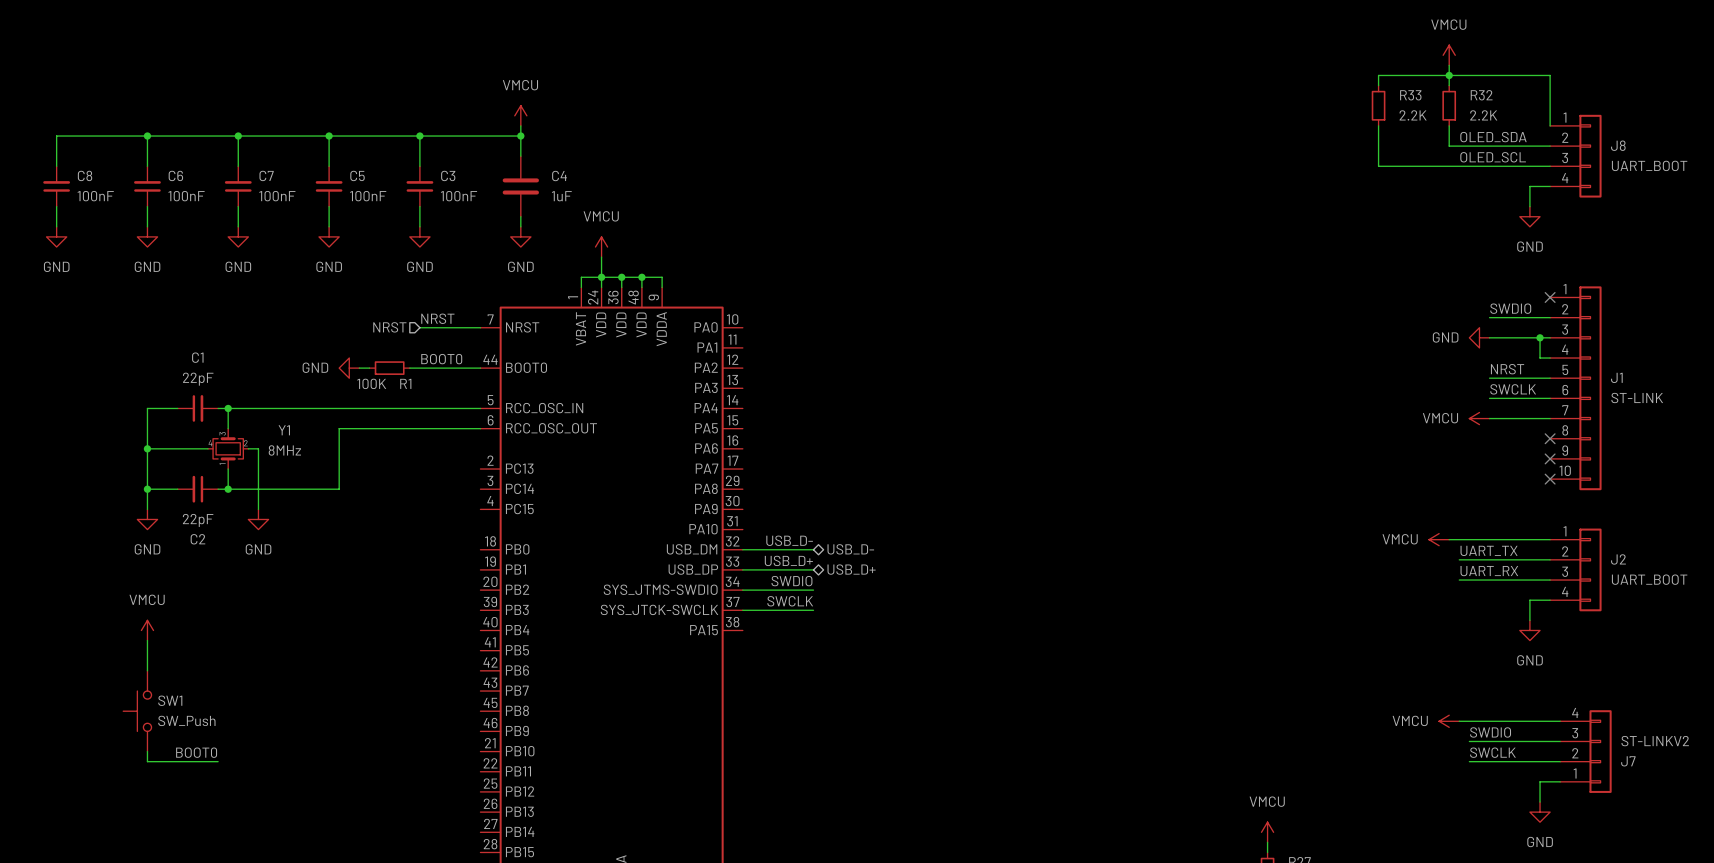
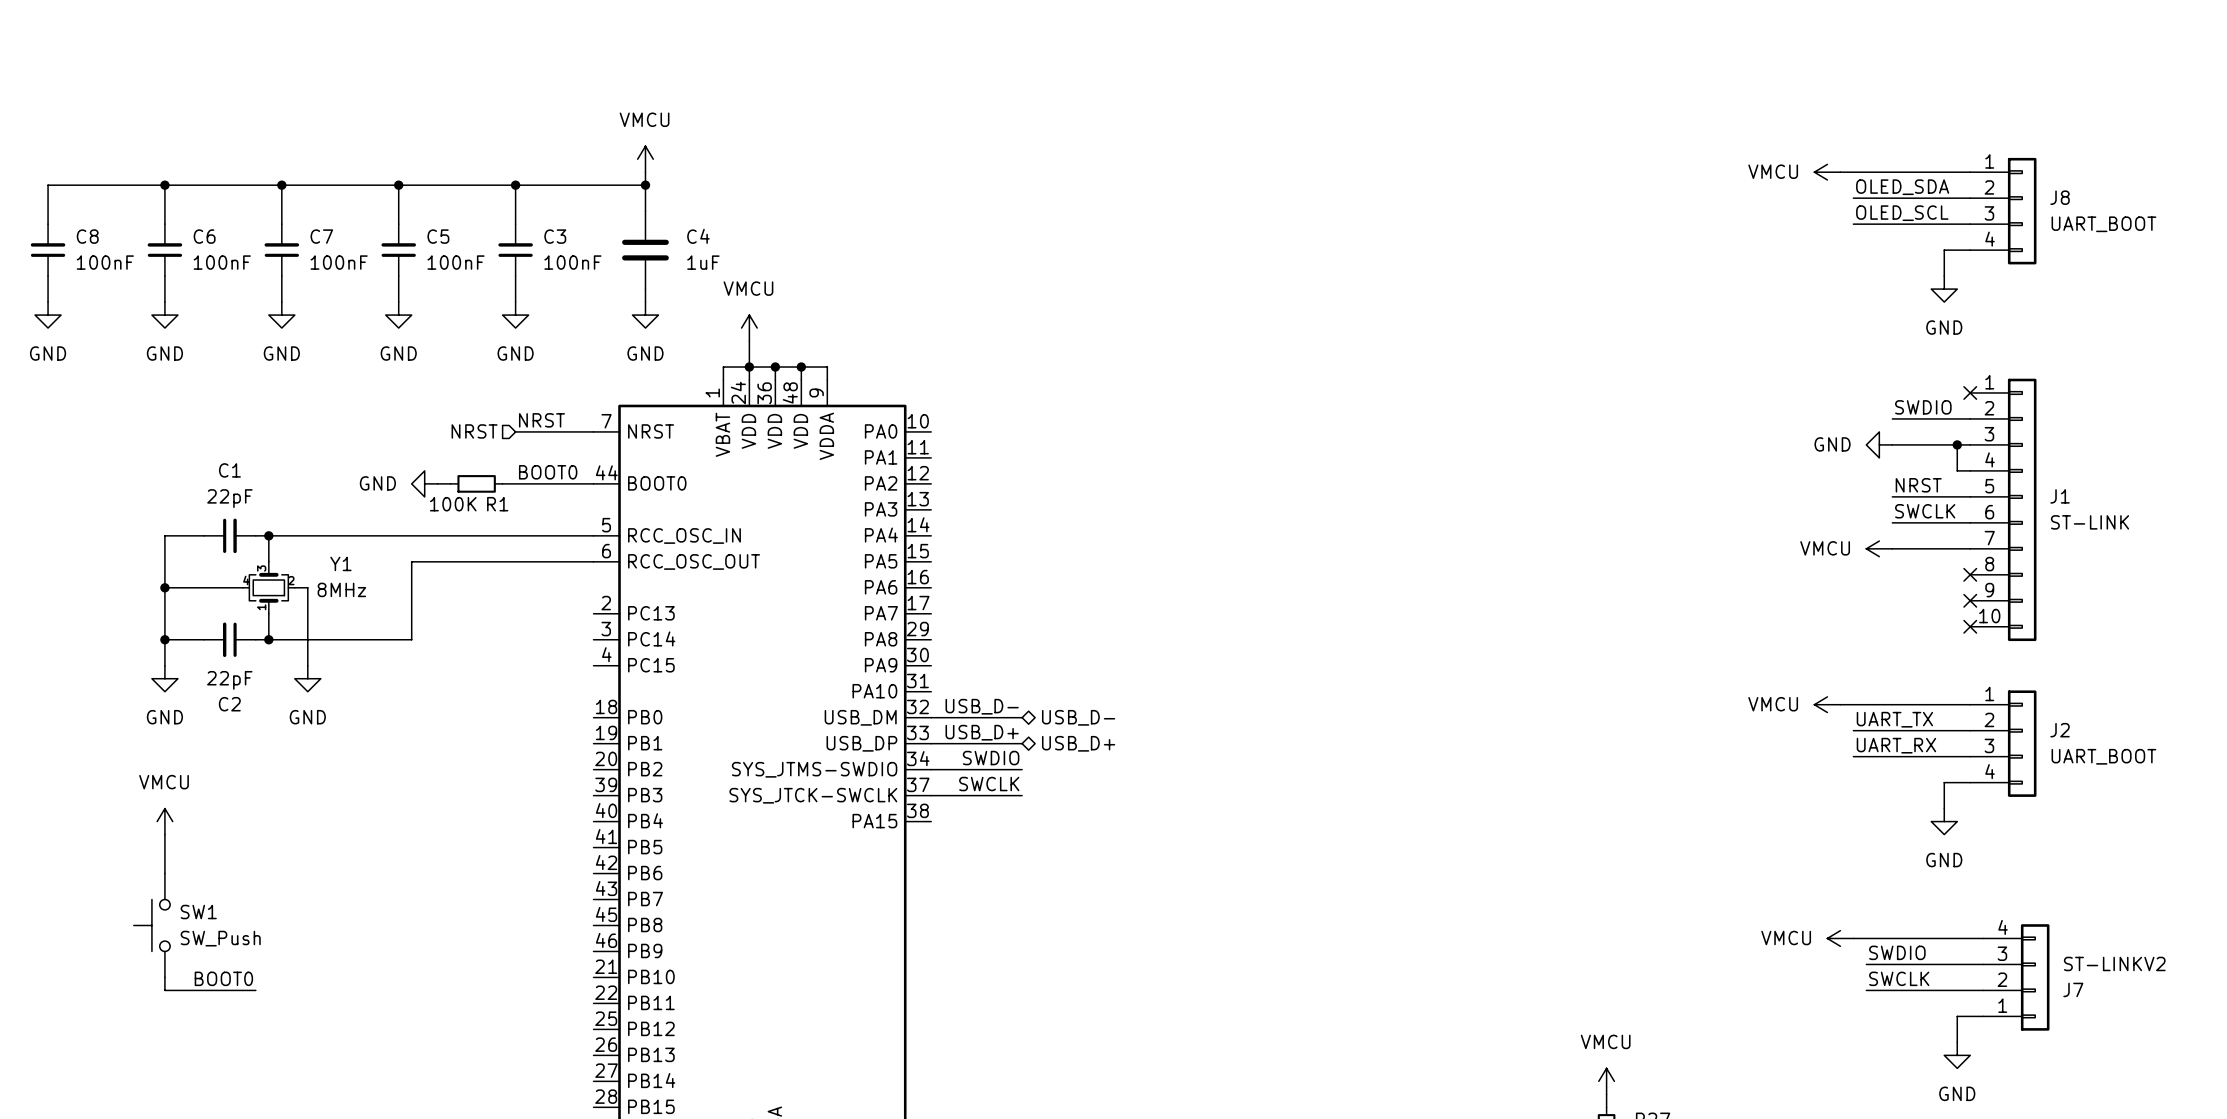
power symbol rotation: 0° (1449, 55) -> 90° counterclockwise (1827, 172)
power symbol position: VMCU (1449, 55) -> VMCU (1827, 172)
wire: (1449, 65) (1449, 85) -> none
junction: (1449, 75) -> none
wire: (1378, 85) (1378, 75) (1550, 75) (1550, 125) -> (1840, 172) (1970, 172)
R33: 2.2K (1378, 105) -> none
R32: 2.2K (1449, 105) -> none
wire: (1378, 125) (1378, 166) (1459, 166) -> none
wire: (1449, 125) (1449, 146) (1459, 146) -> none

